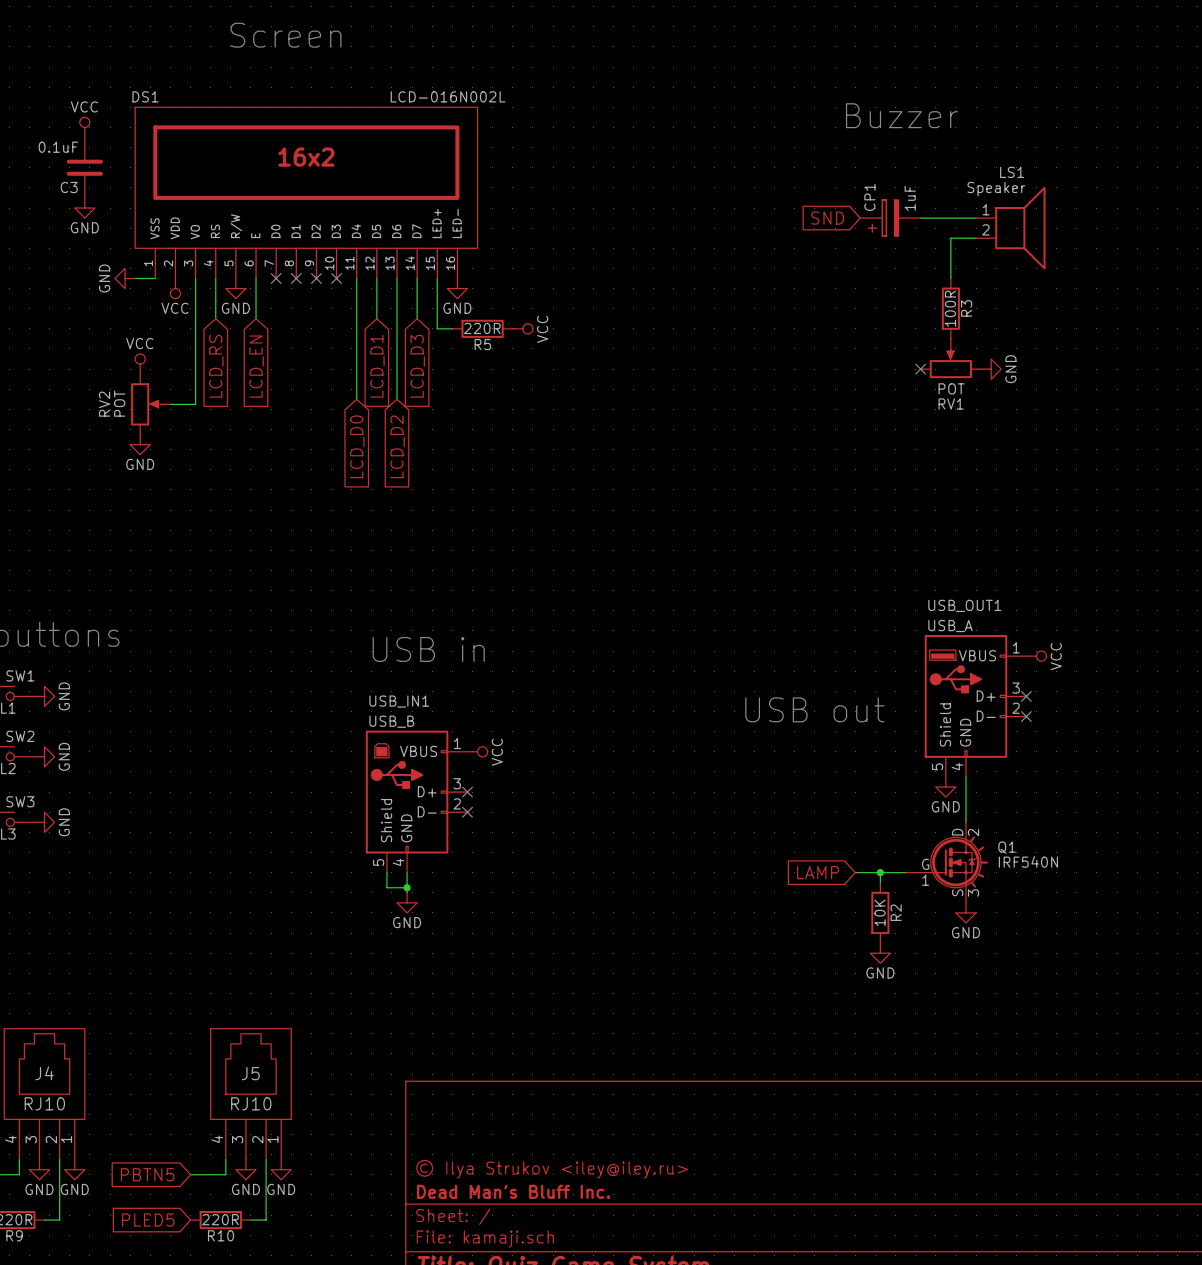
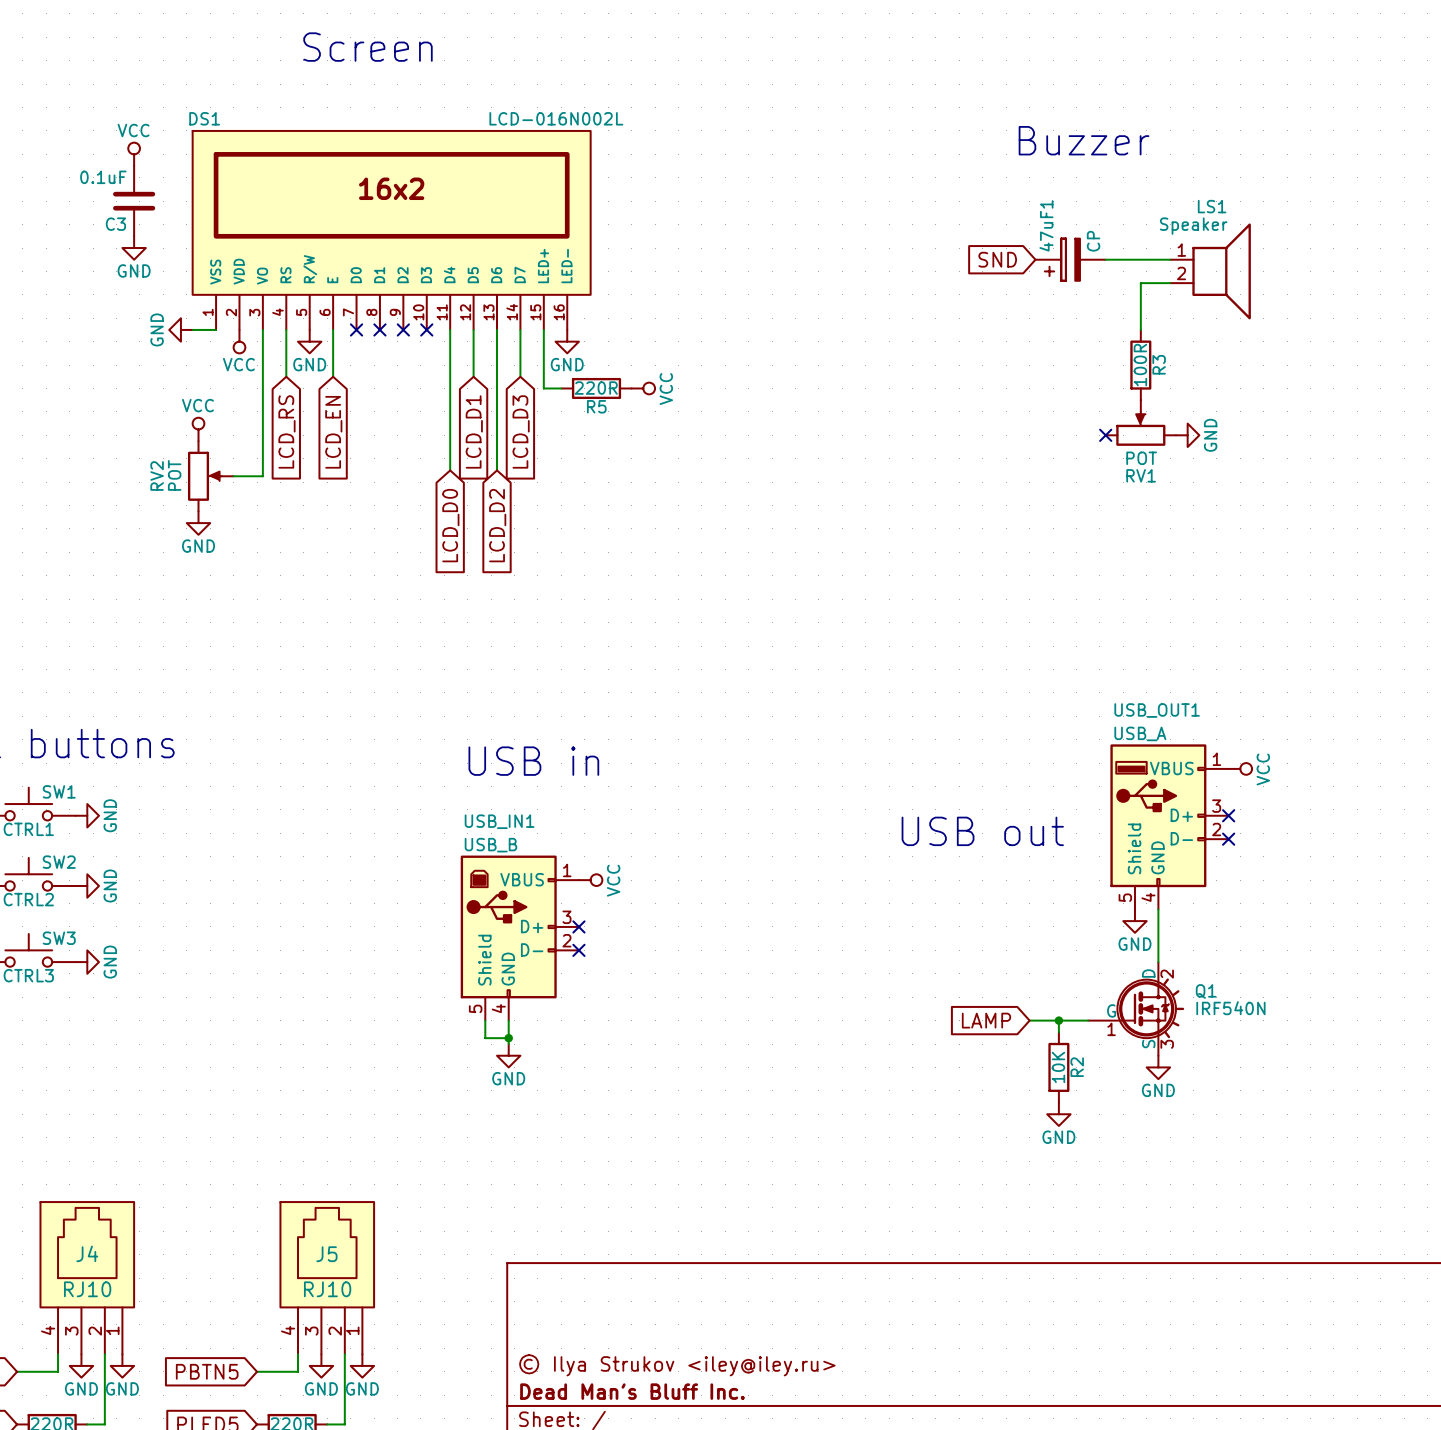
CP1 name: CP1 (869, 197) -> 47uF1 (1046, 225)
CP1 value: 1uF (910, 198) -> CP (1093, 241)

